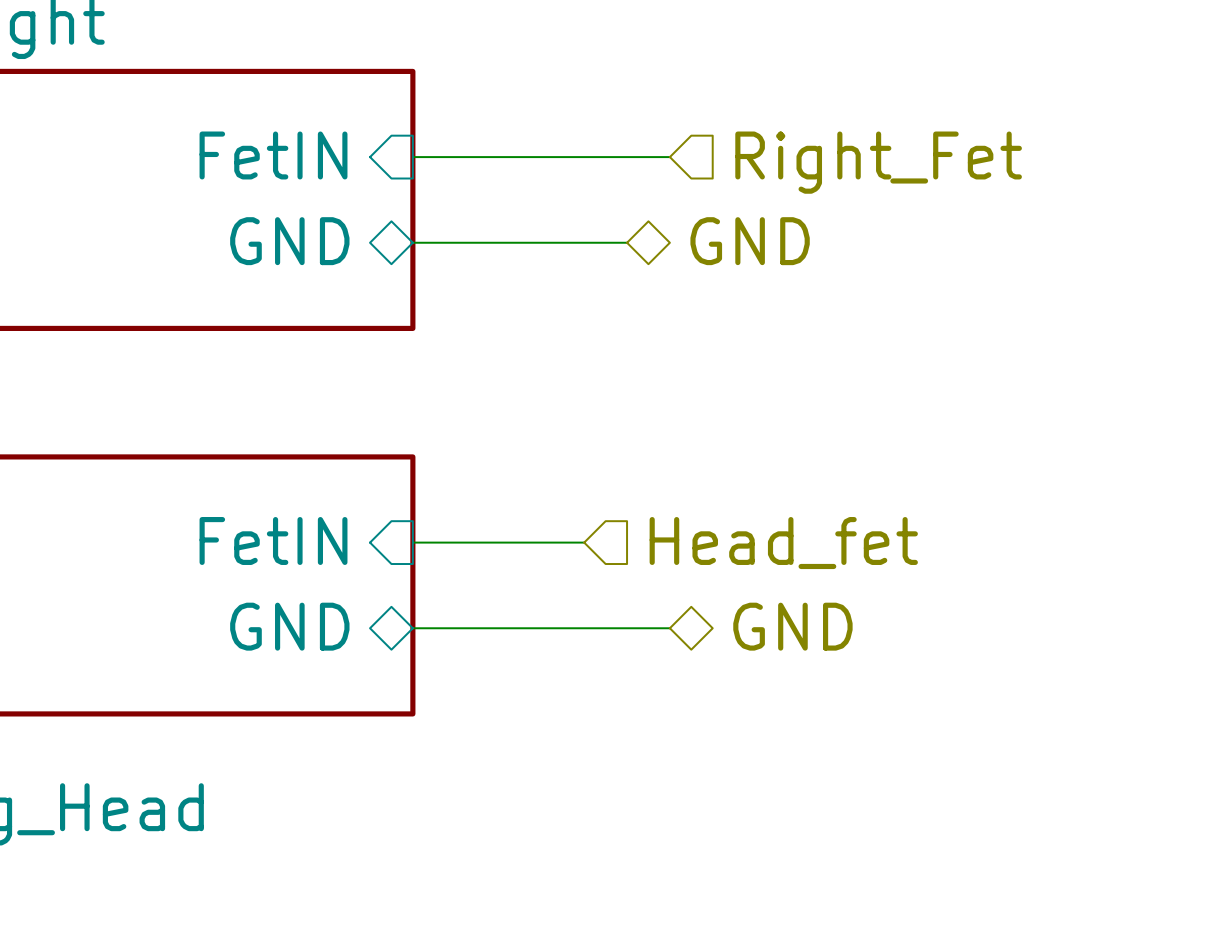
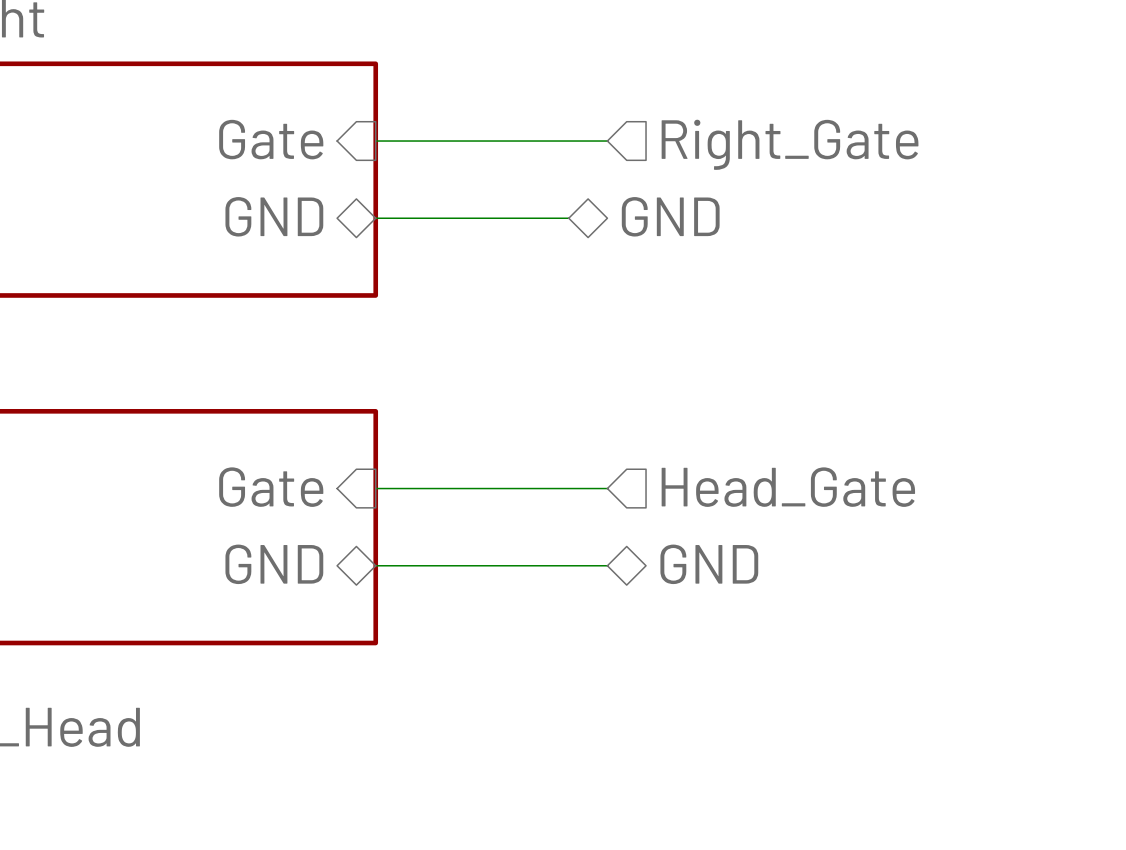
sheet pin: FetIN (273, 155) -> Gate (271, 139)
hierarchical label: Right_Fet (878, 162) -> Right_Gate (790, 144)
sheet pin: FetIN (273, 540) -> Gate (271, 487)
wire: none -> (530, 488) (607, 488)
hierarchical label: Head_fet (783, 543) -> Head_Gate (788, 487)

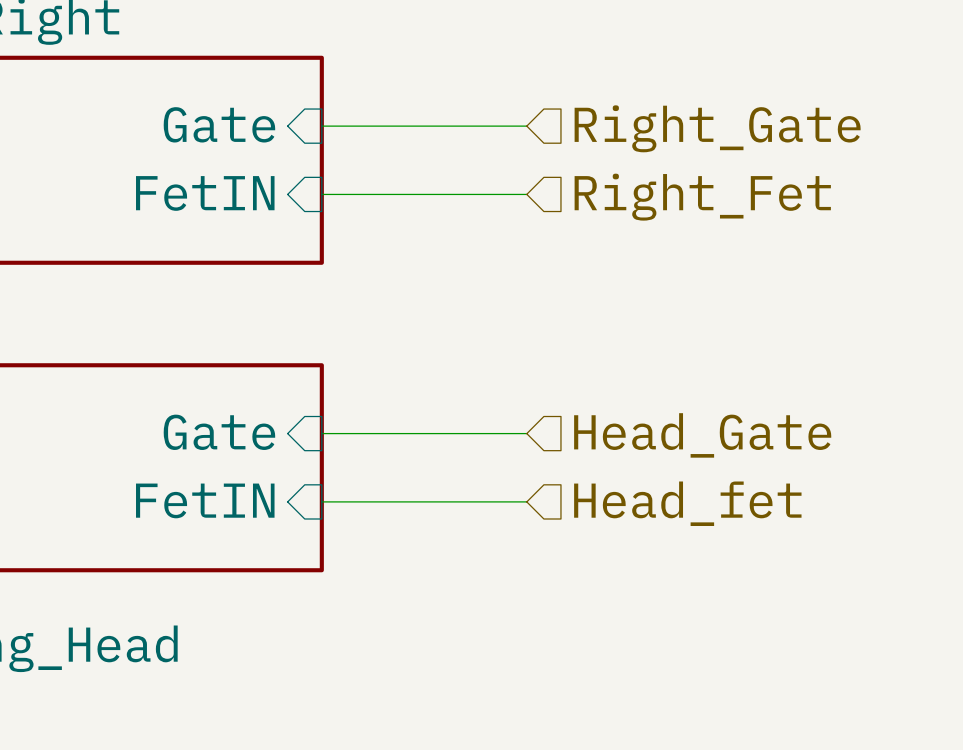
sheet pin shape: bidirectional (274, 216) -> input (205, 193)
sheet pin: GND (274, 216) -> FetIN (205, 193)
hierarchical label: GND (670, 216) -> none
wire: none -> (492, 194) (526, 194)
hierarchical label: none -> Right_Fet (702, 197)
sheet pin shape: bidirectional (274, 564) -> input (205, 500)
sheet pin: GND (274, 564) -> FetIN (205, 500)
hierarchical label shape: bidirectional (709, 564) -> input (687, 503)
hierarchical label: GND (709, 564) -> Head_fet (687, 503)

